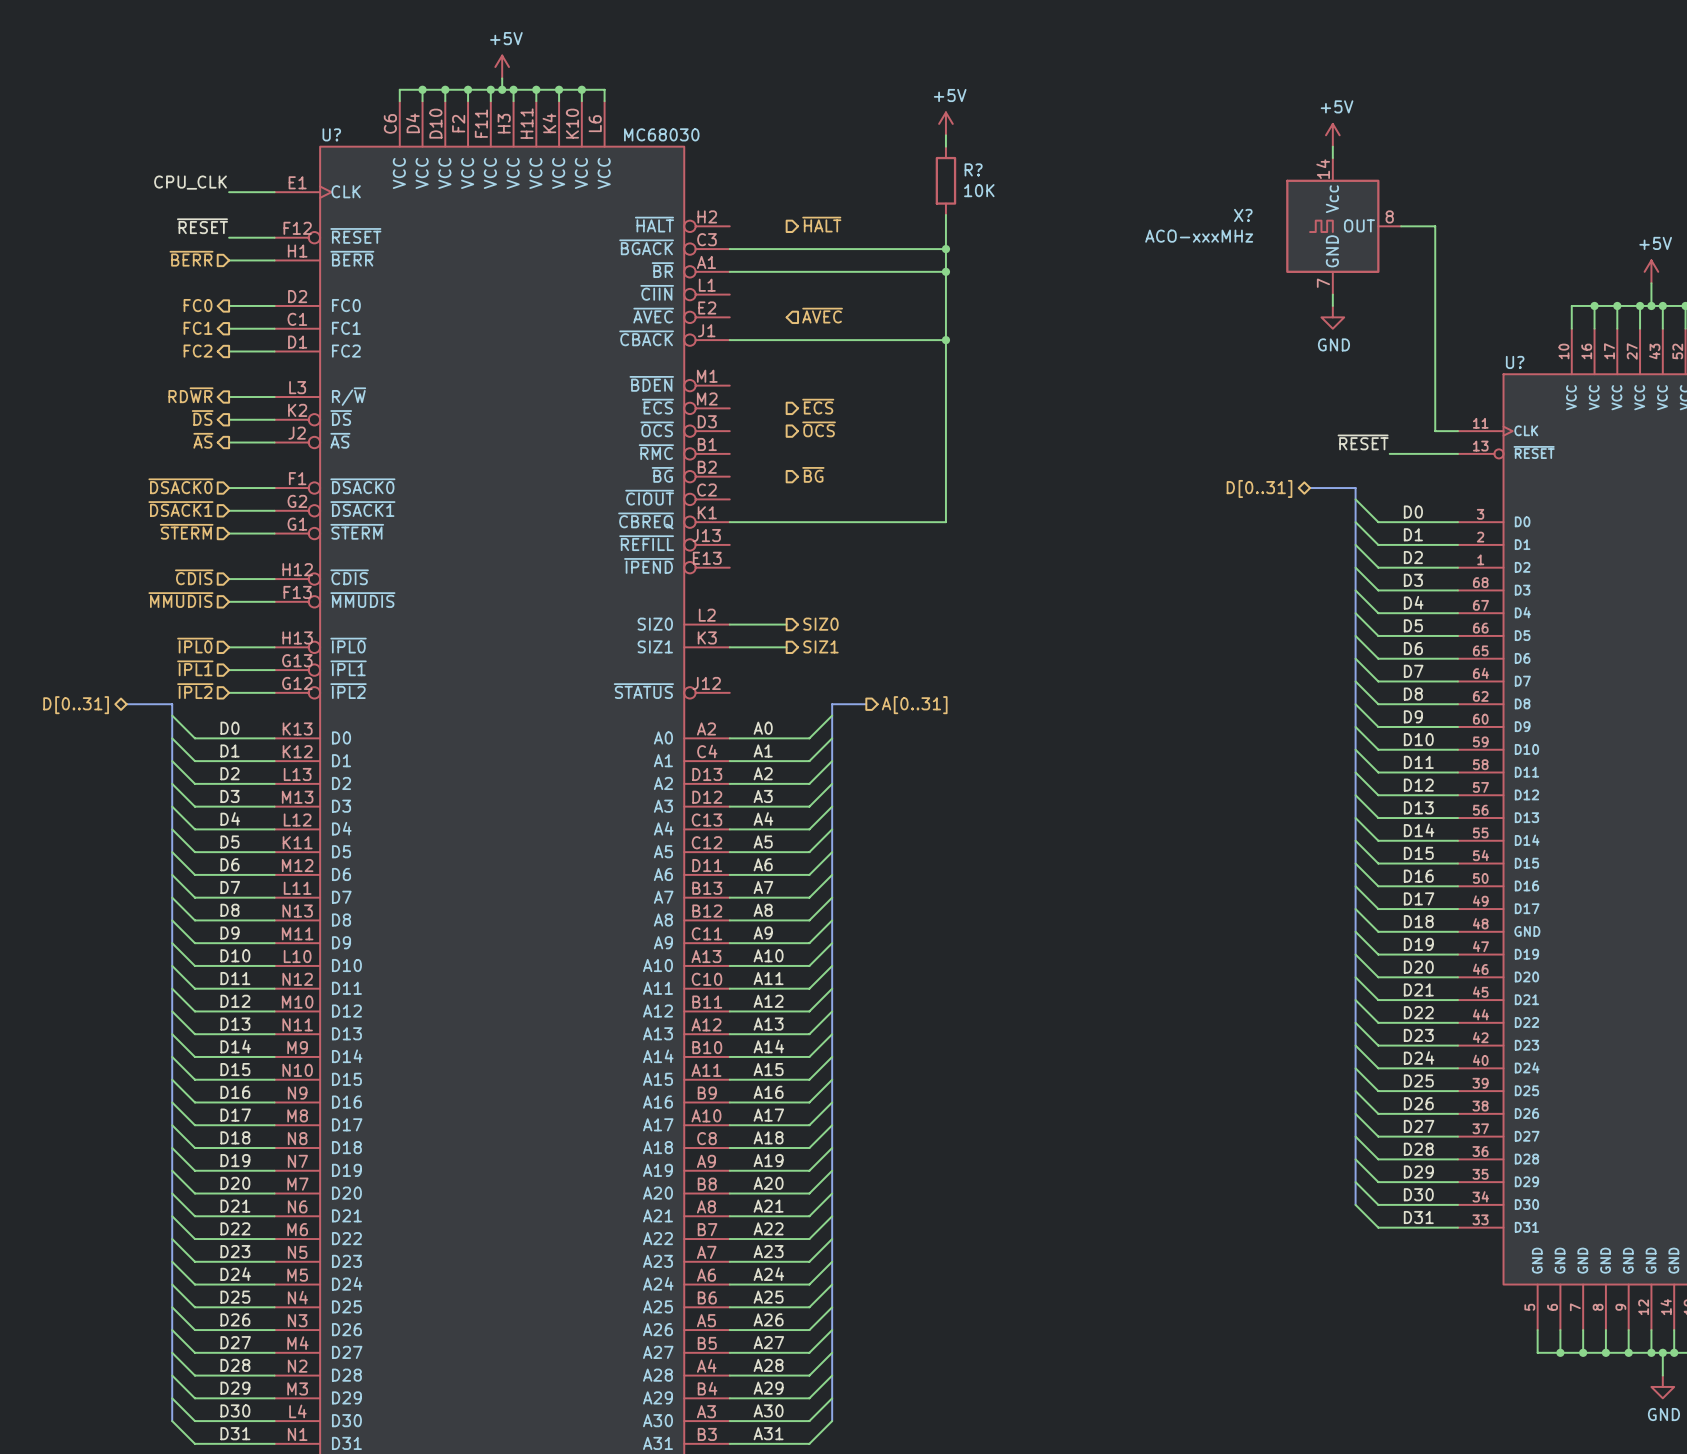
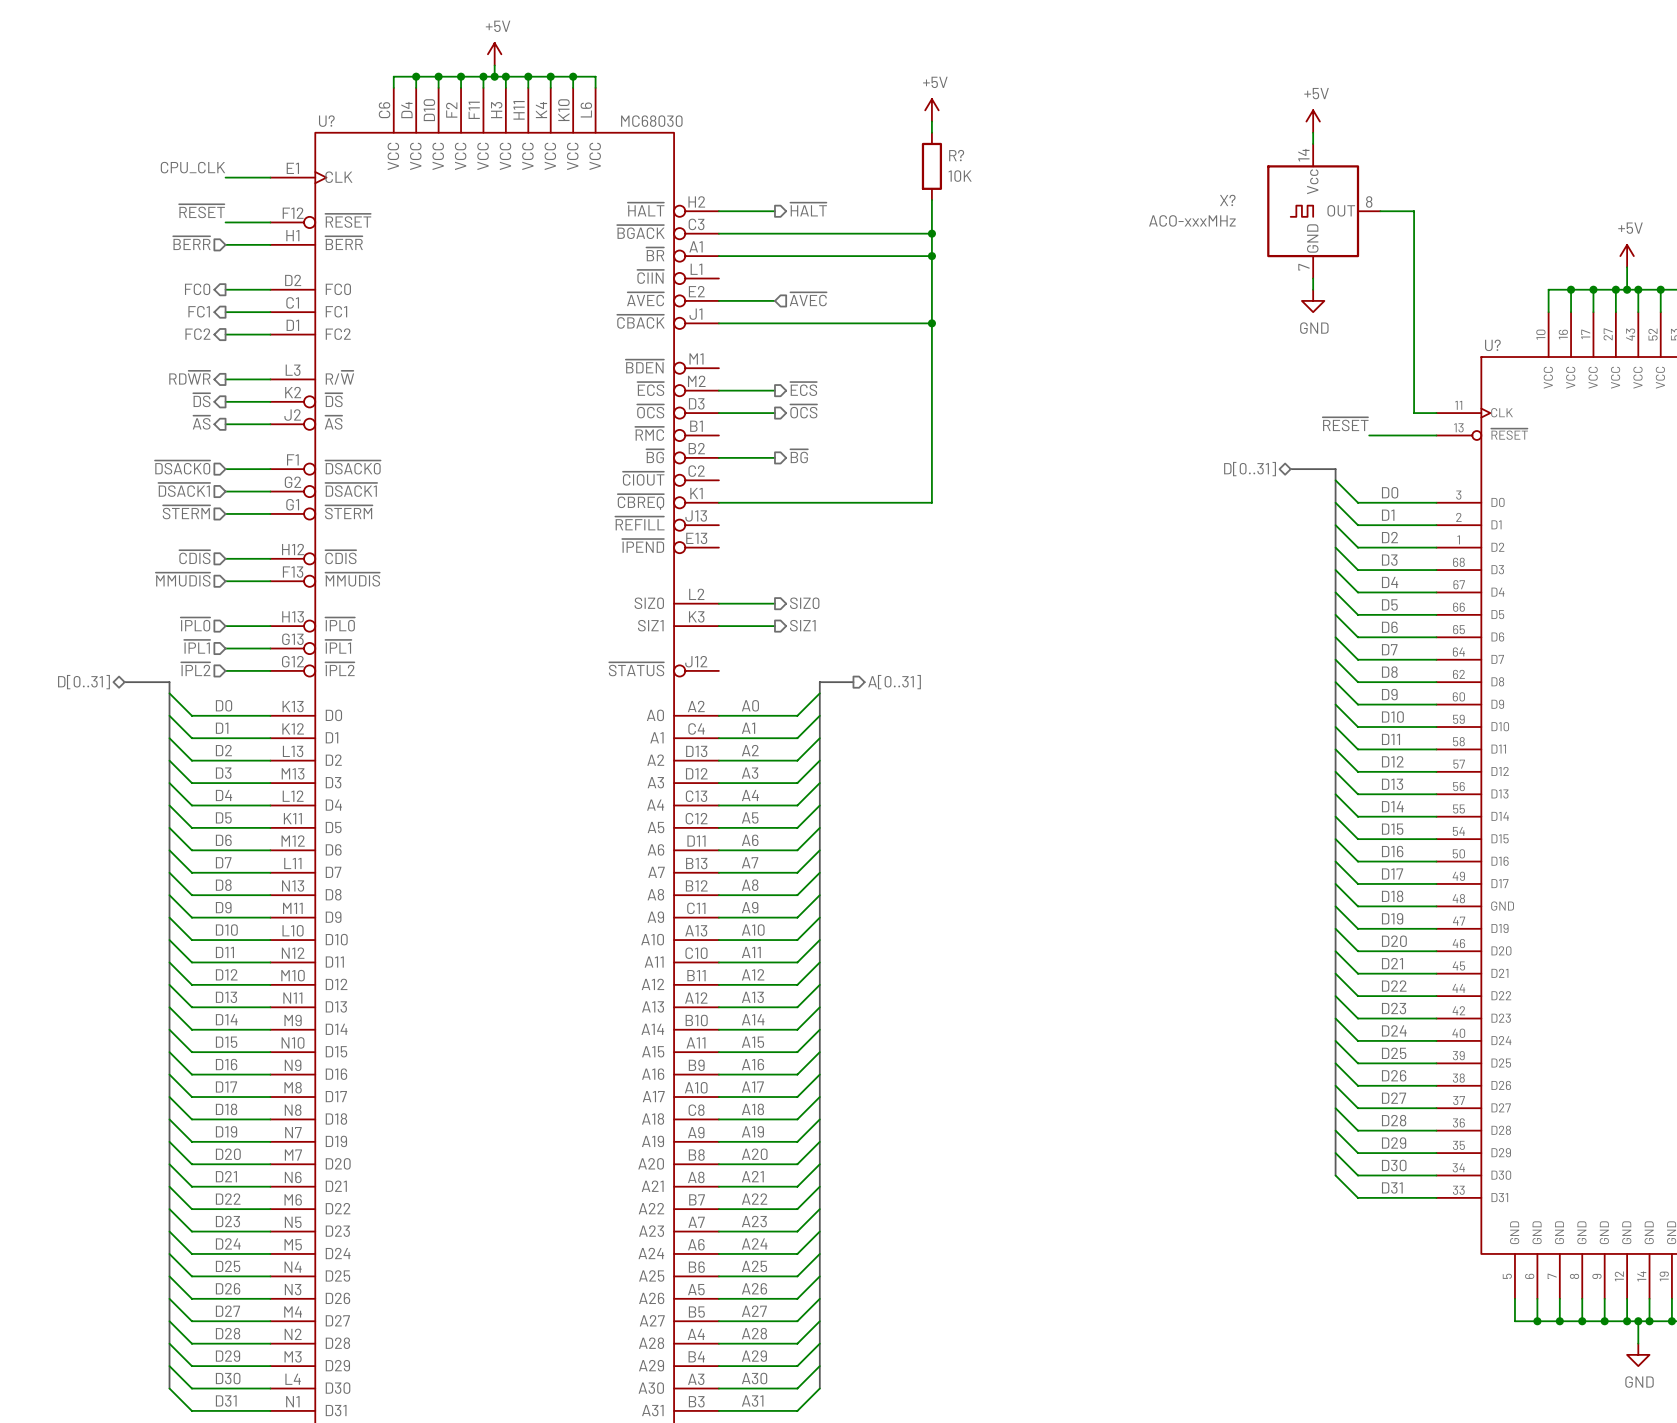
wire: none -> (718, 211) (774, 211)
wire: none -> (718, 300) (774, 300)
wire: none -> (718, 390) (774, 390)
wire: none -> (718, 413) (774, 413)
wire: none -> (718, 457) (774, 457)

